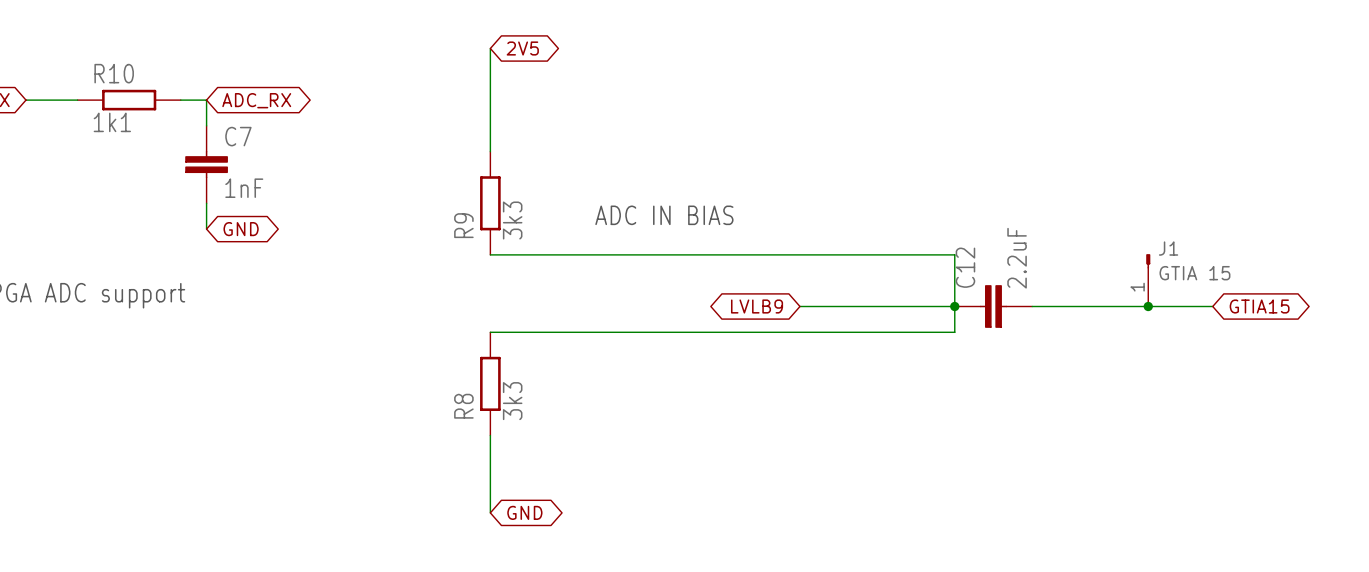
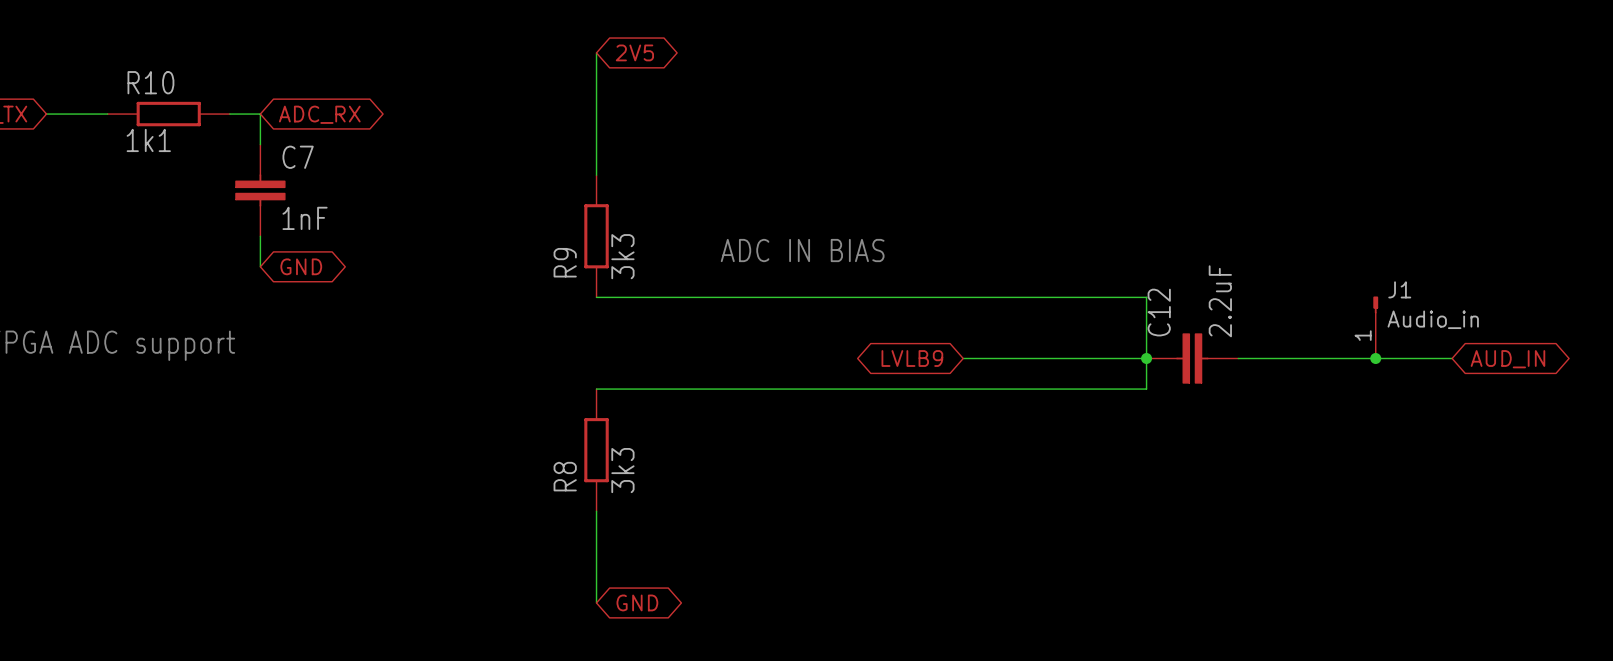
J1 value: GTIA 15 (1194, 273) -> Audio_in (1433, 319)
global label: GTIA15 (1259, 306) -> AUD_IN (1507, 359)

